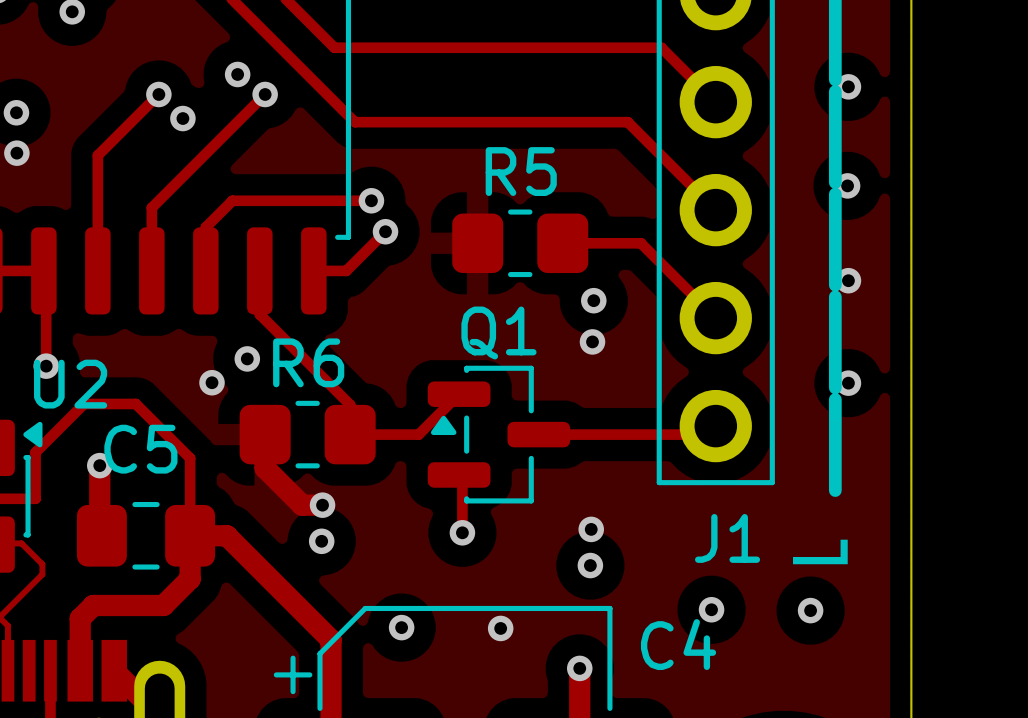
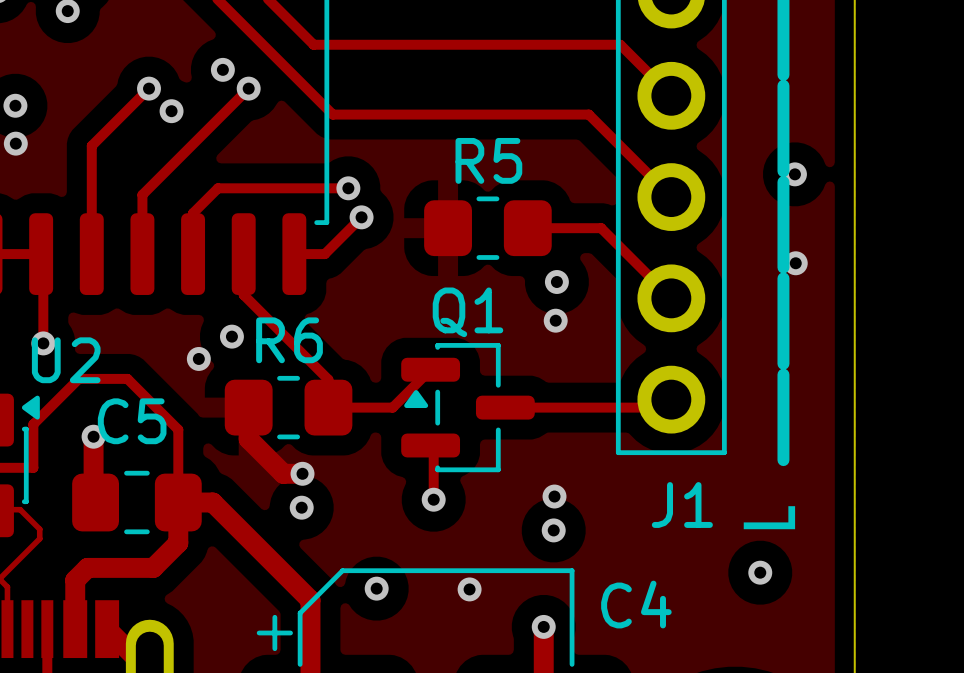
via: (848, 86) -> none
via: (848, 383) -> none
via: (711, 609) -> none

